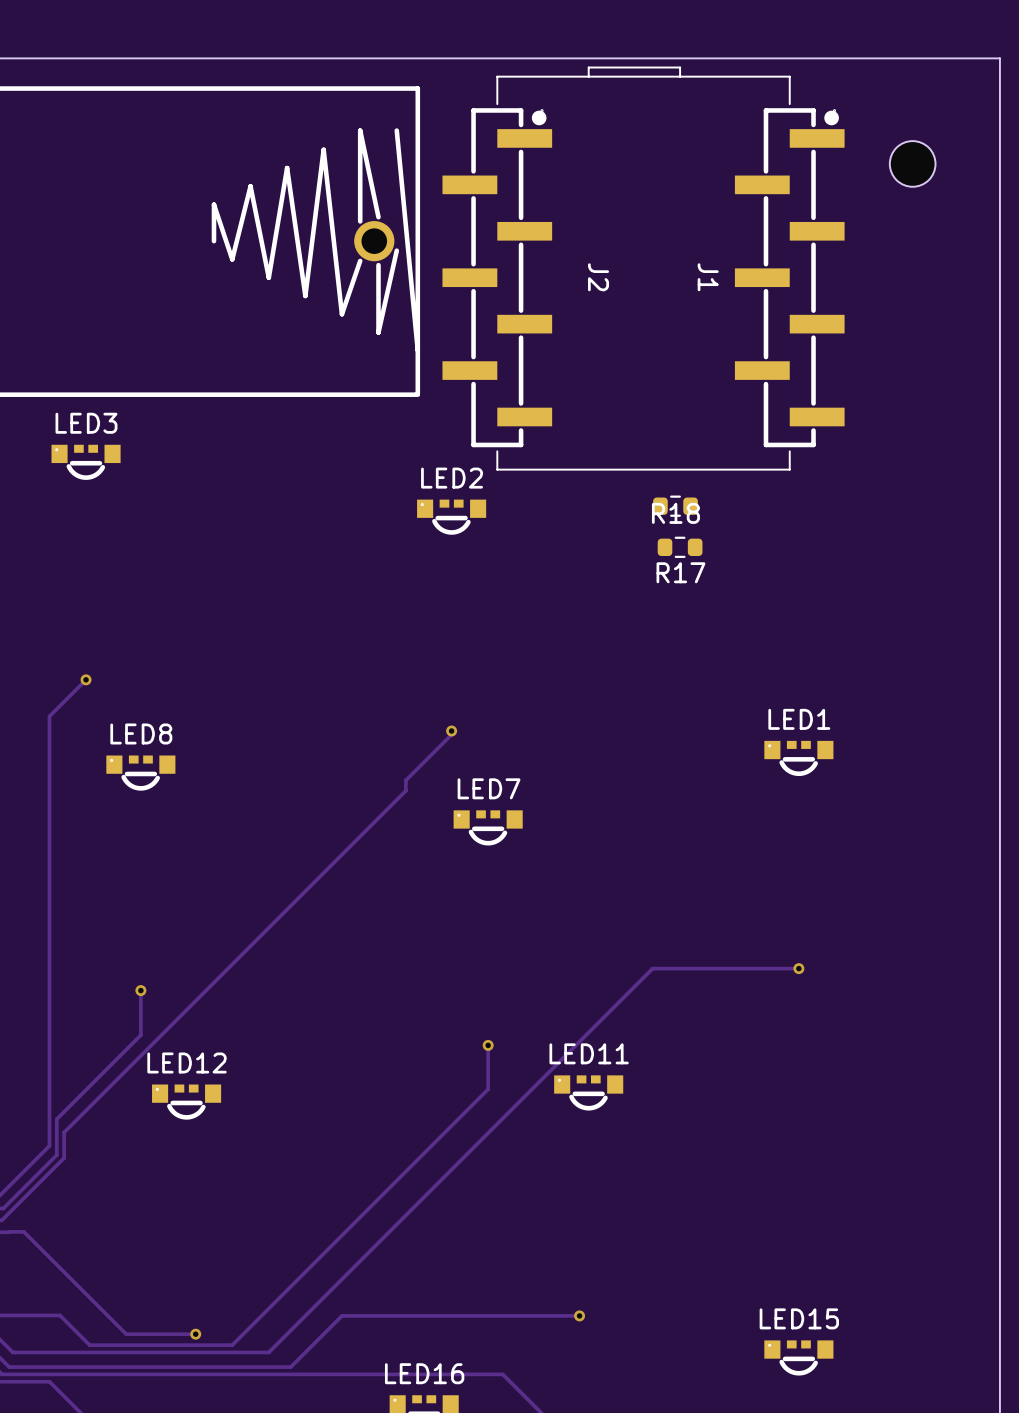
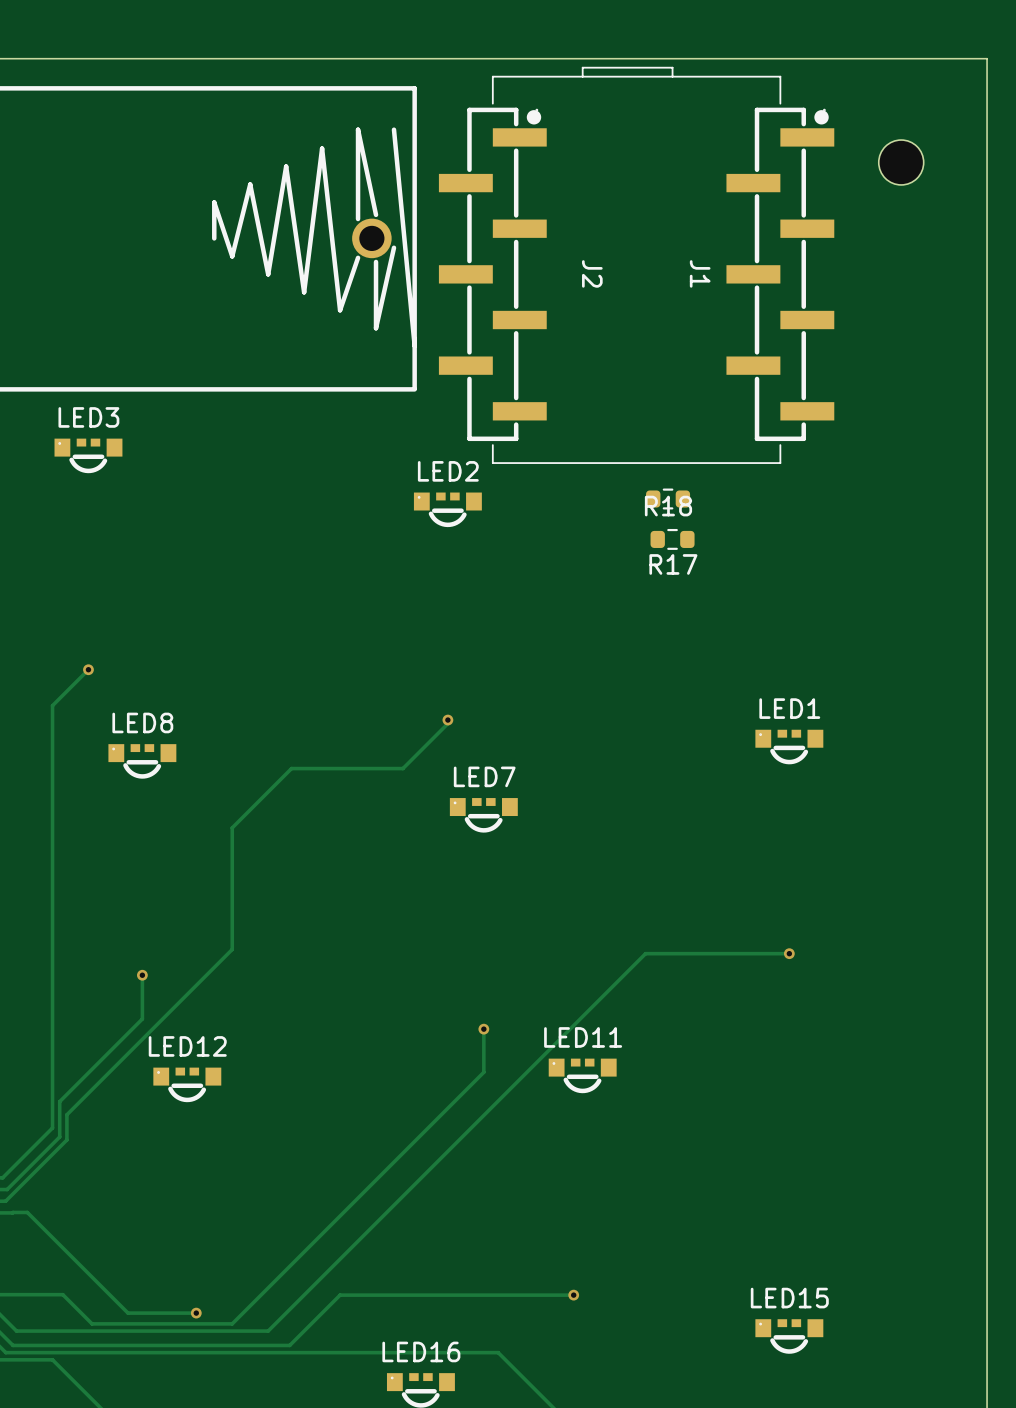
track: (405, 780) (405, 790) (232, 964) -> (402, 768) (291, 768) (232, 827) (232, 949)

